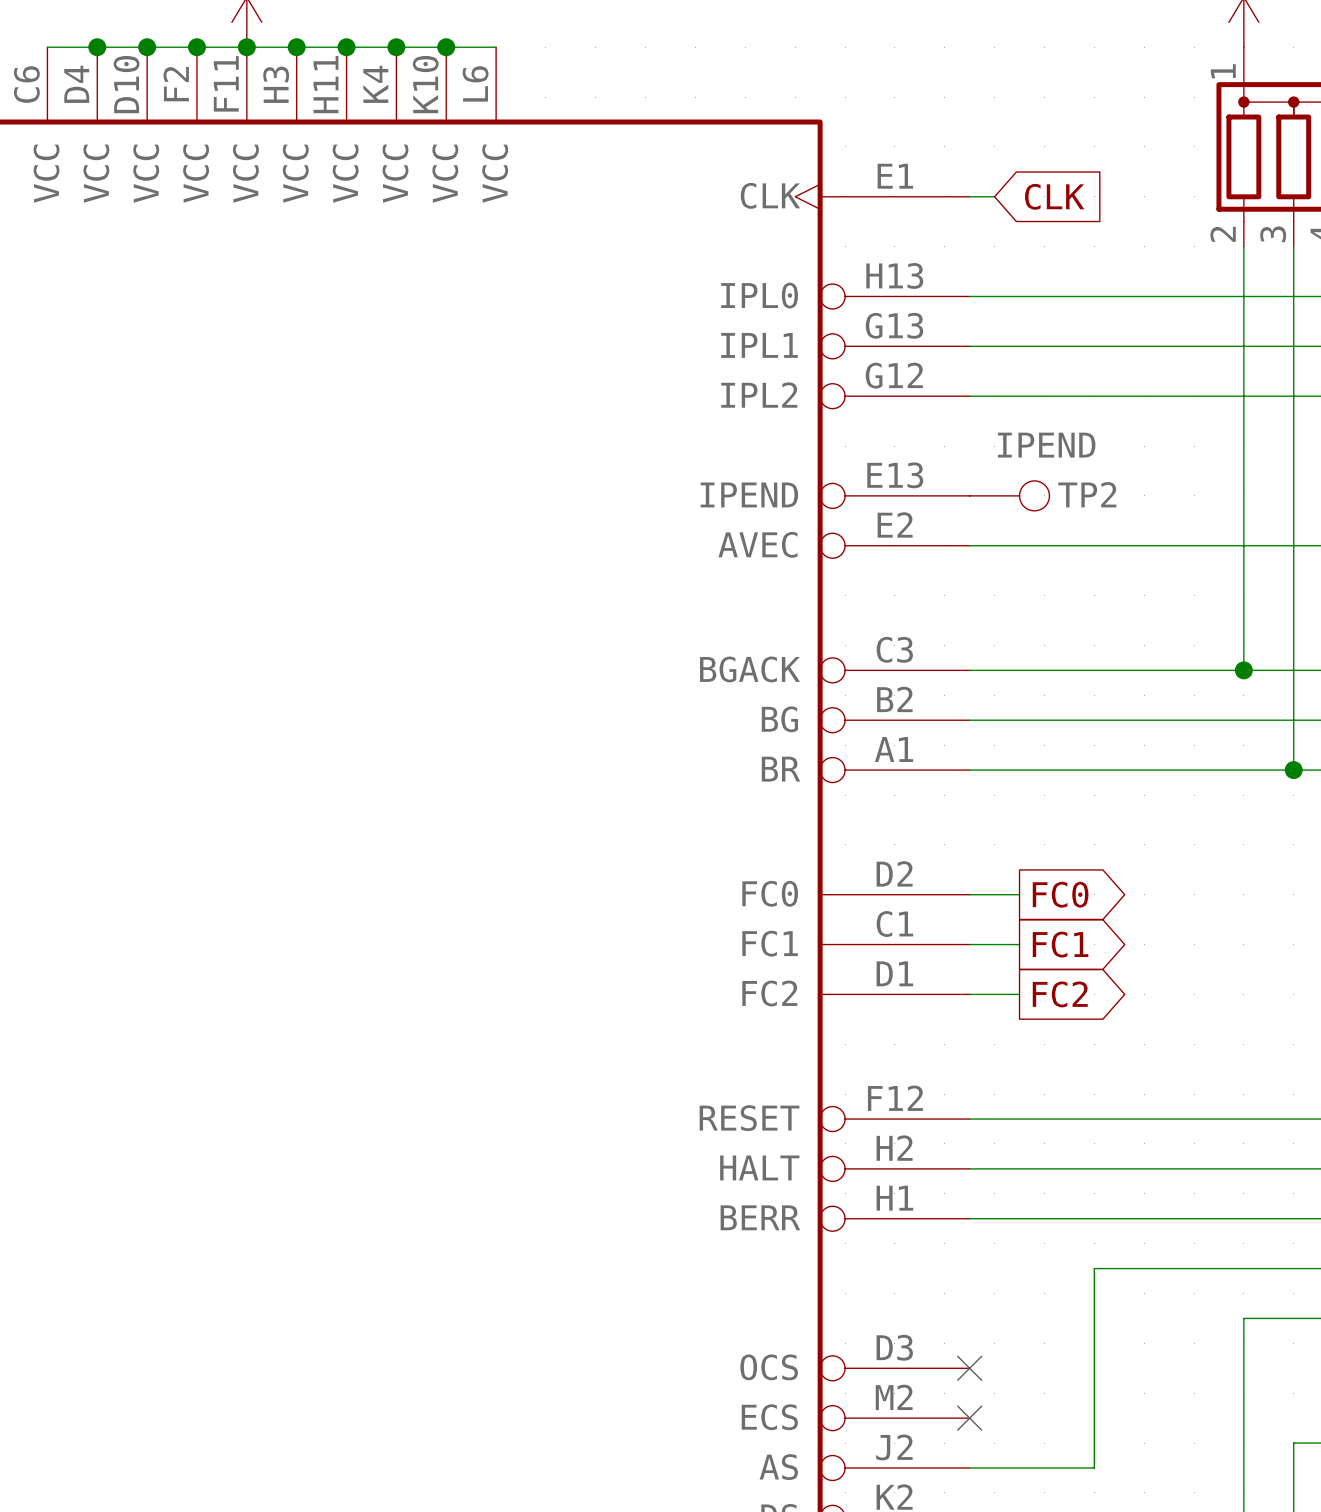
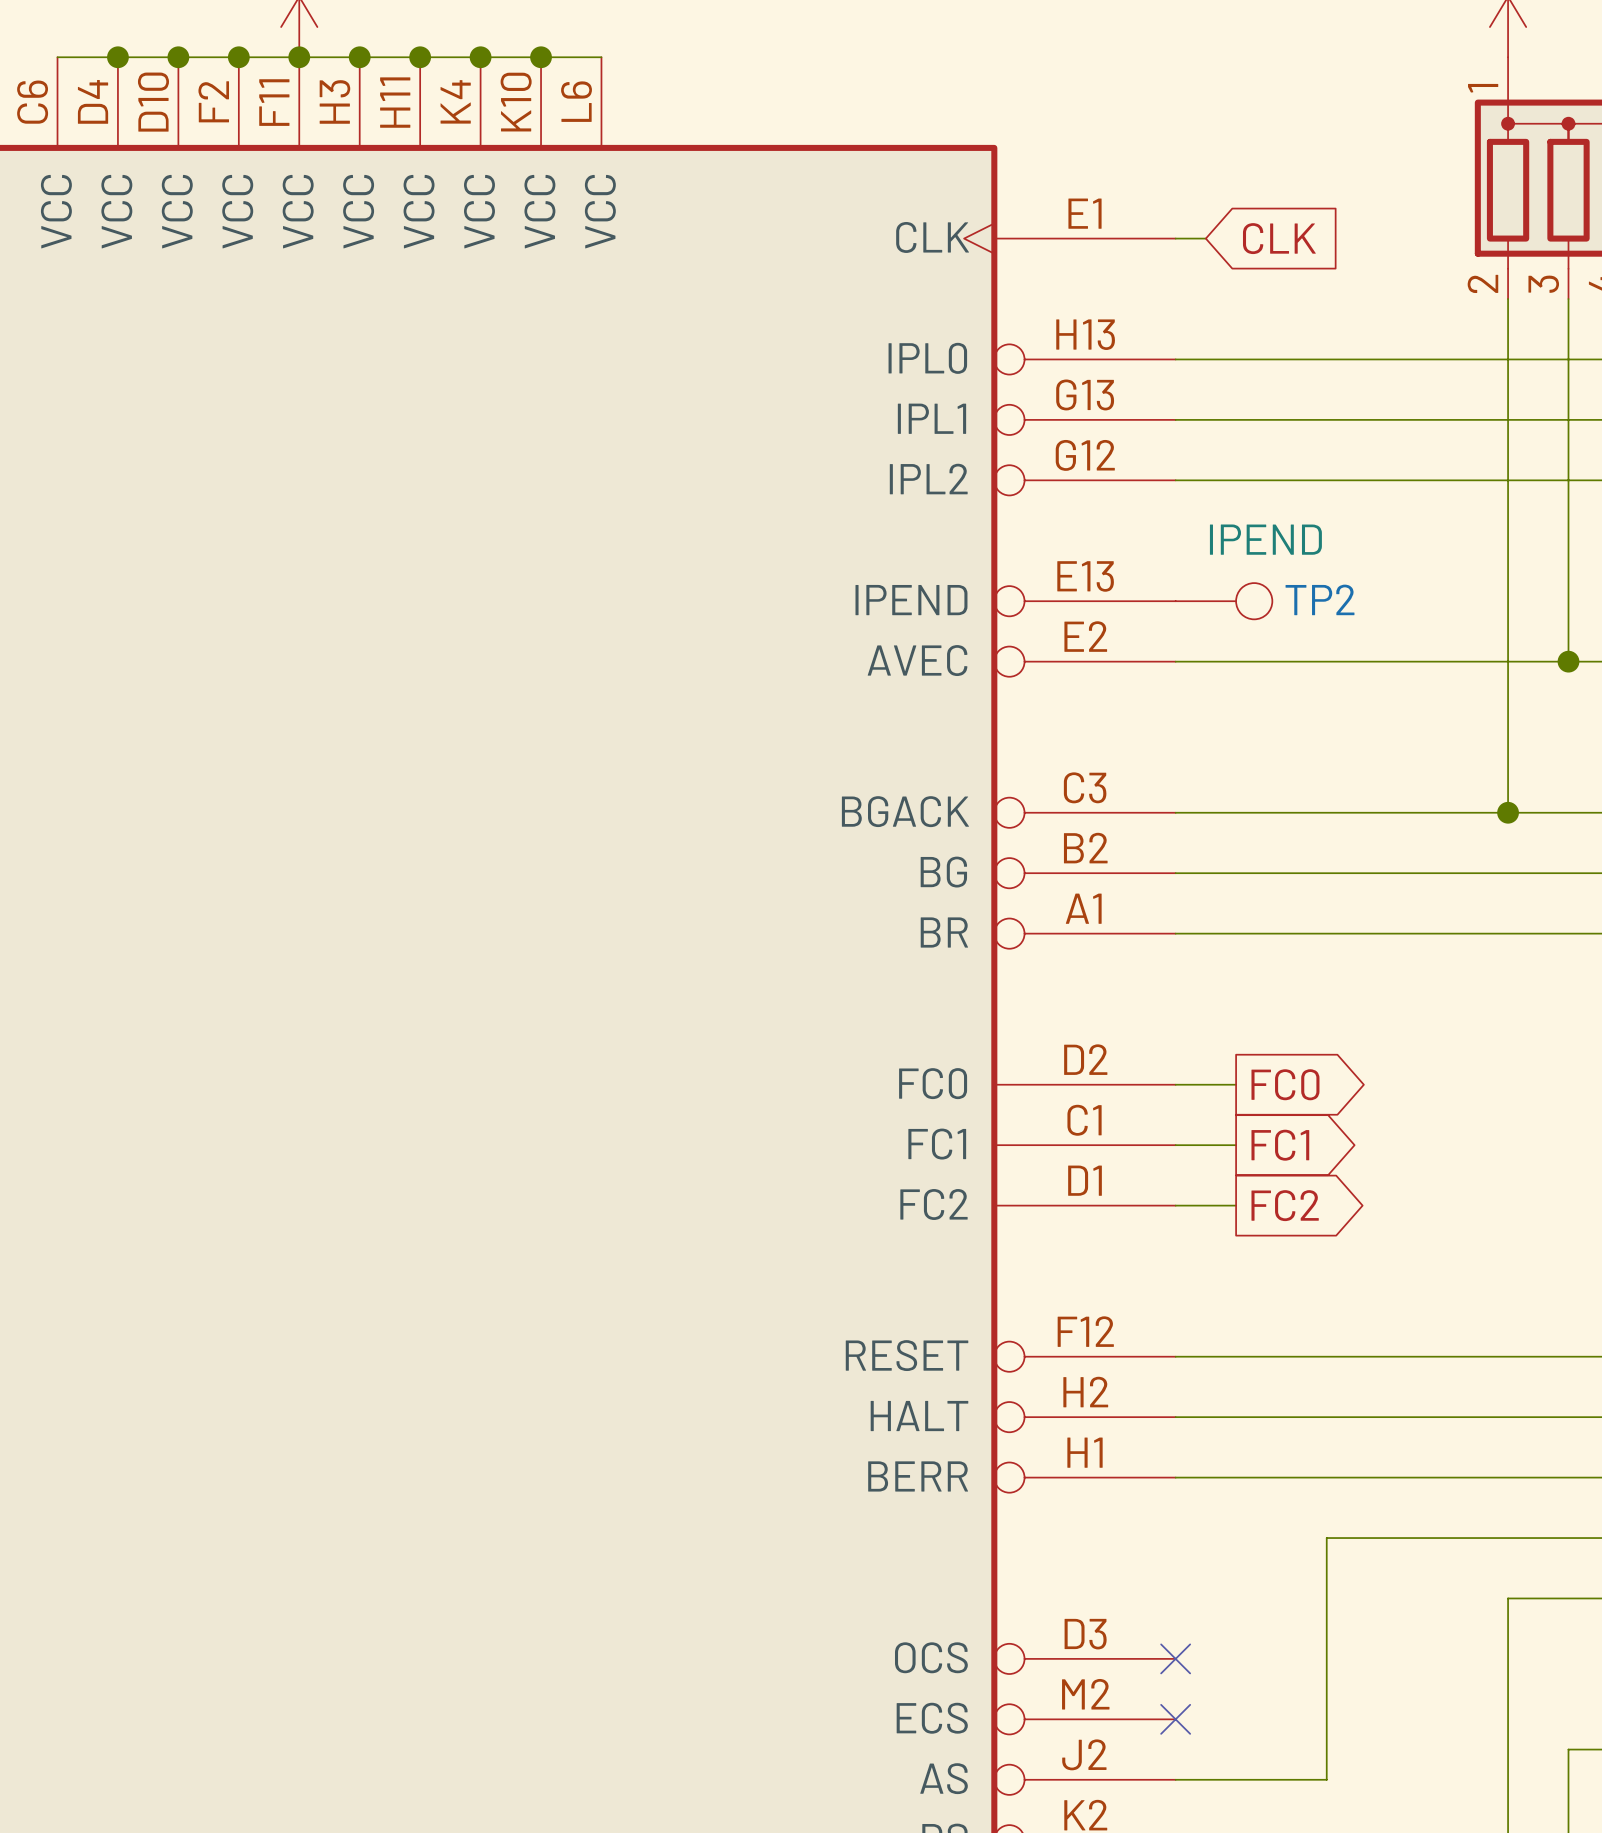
wire: (1293, 545) (1293, 770) -> none
junction: none -> (1568, 661)
junction: (1293, 770) -> none

